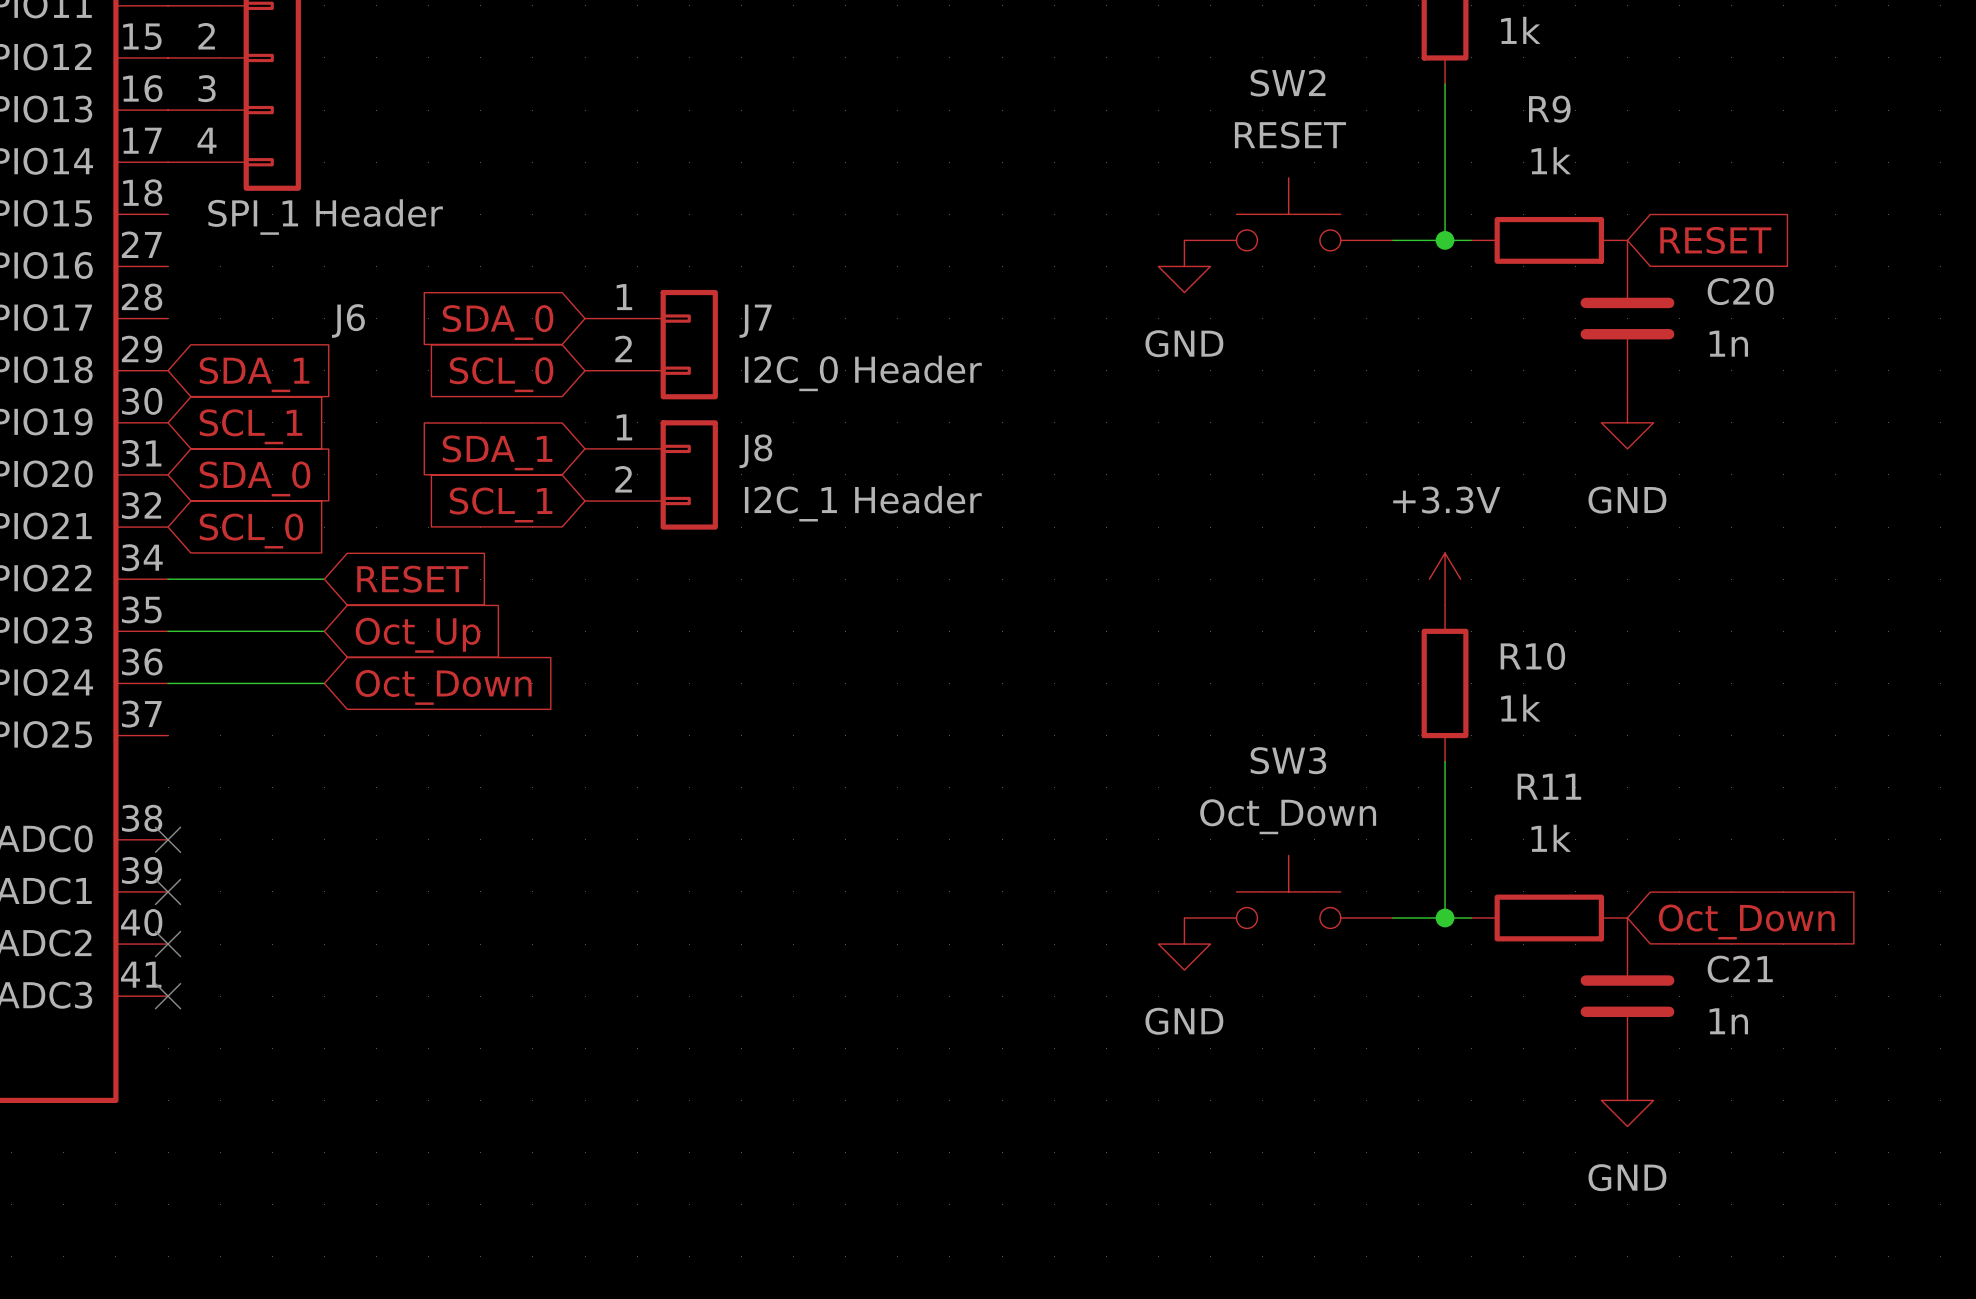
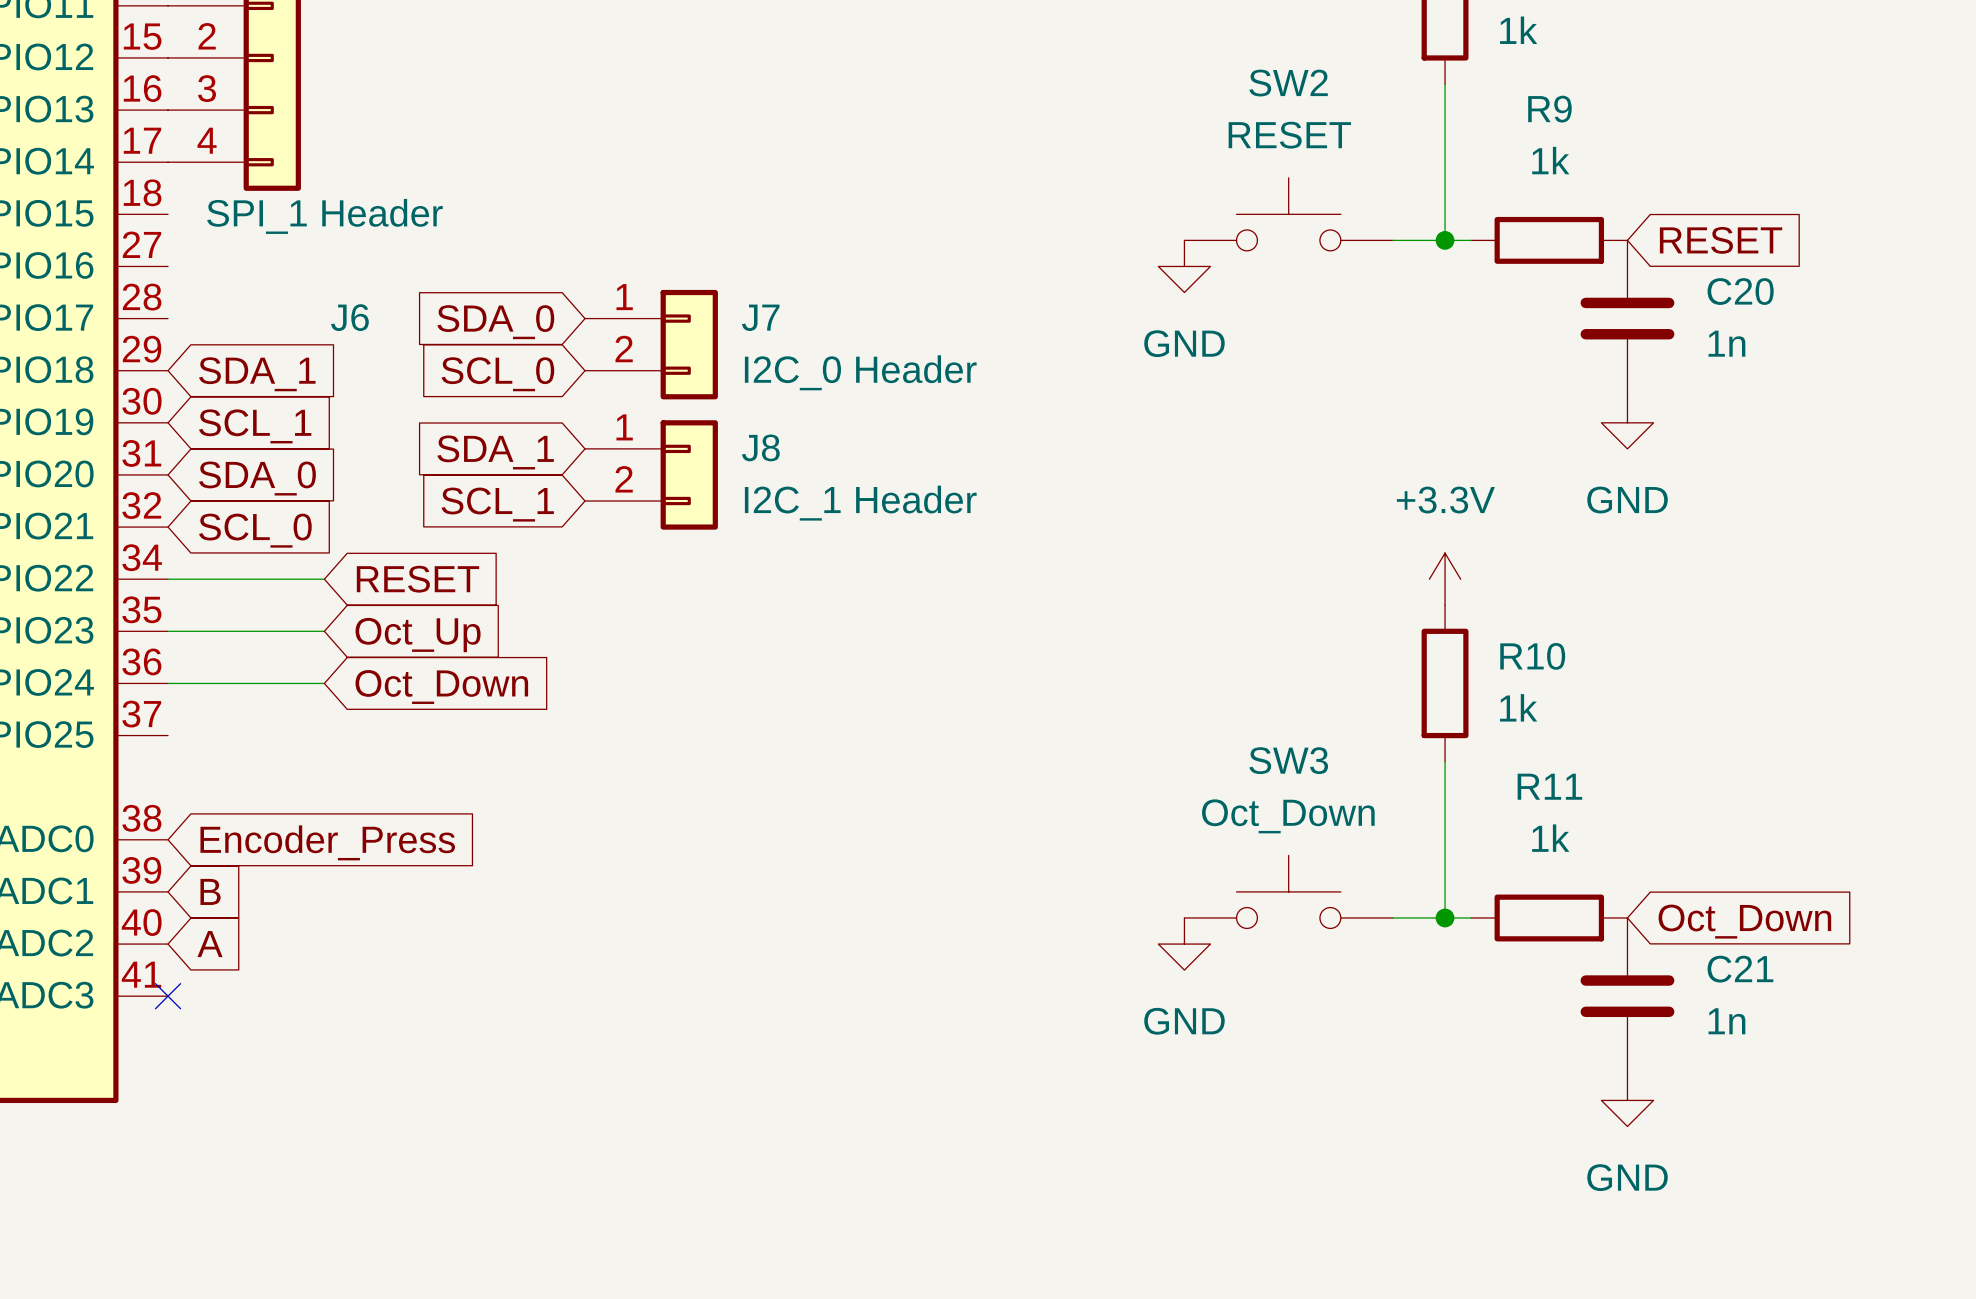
no-connect mark: (168, 839) -> none
global label: none -> Encoder_Press (327, 842)
no-connect mark: (168, 891) -> none
global label: none -> B (210, 891)
no-connect mark: (168, 944) -> none
global label: none -> A (209, 944)

